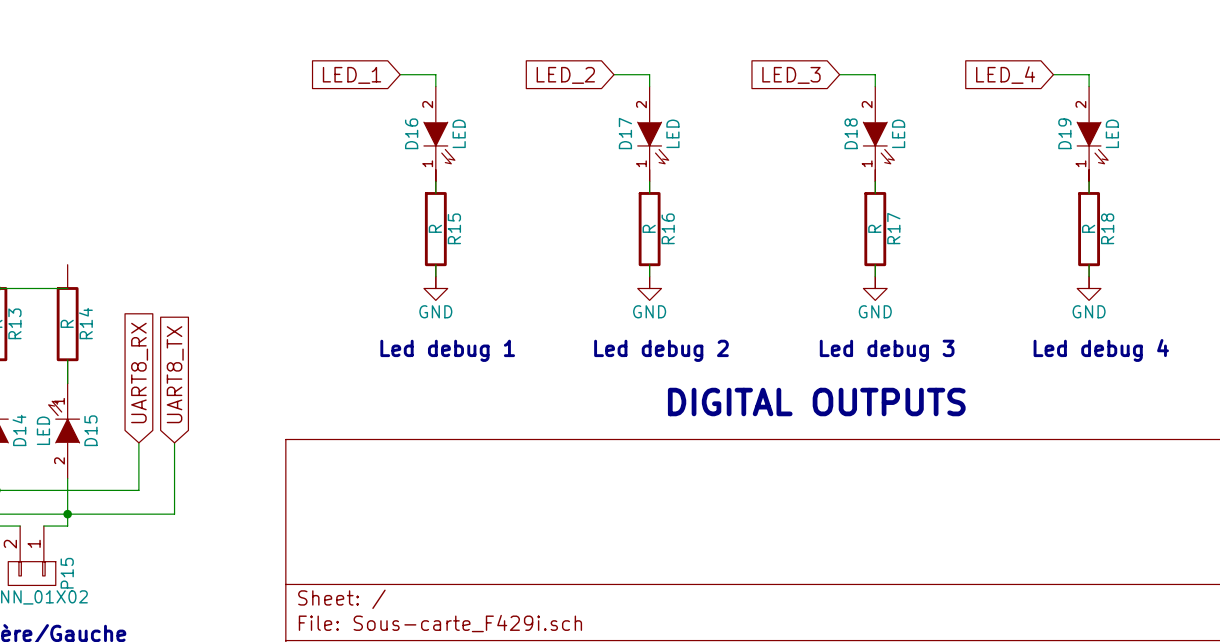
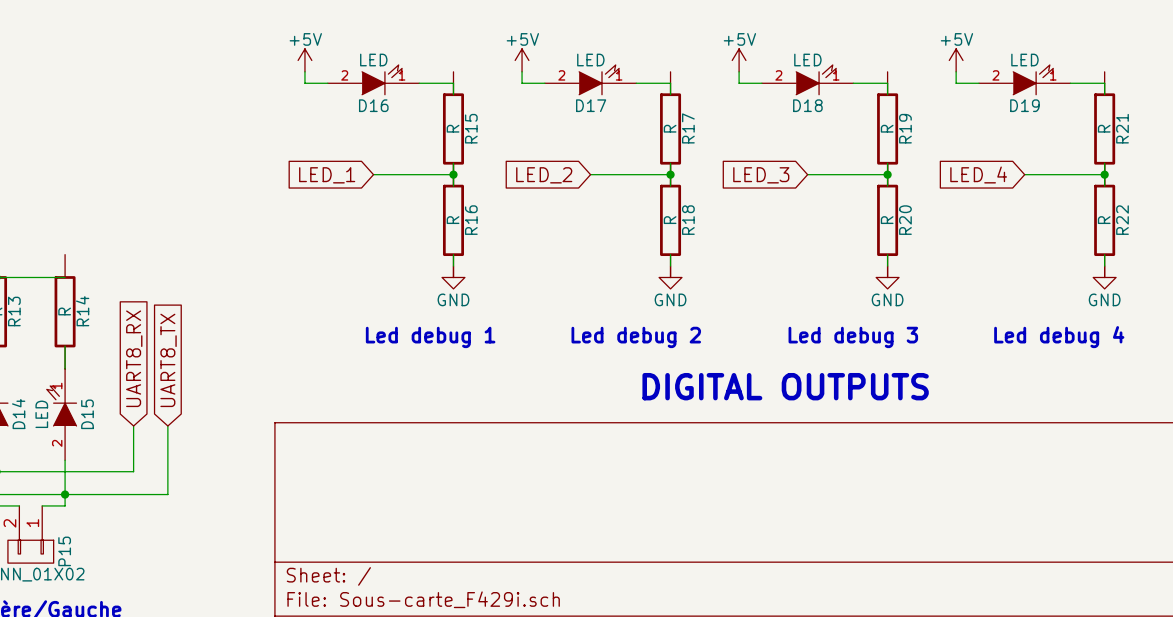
power symbol: none -> +5V (304, 60)
power symbol: none -> +5V (522, 60)
power symbol: none -> +5V (739, 60)
power symbol: none -> +5V (956, 60)
wire: none -> (304, 71) (304, 83) (327, 83)
wire: (400, 74) (435, 74) (435, 86) -> (453, 94) (453, 83) (419, 83)
wire: none -> (522, 71) (522, 83) (544, 83)
wire: (613, 74) (649, 74) (649, 86) -> (636, 83) (670, 83) (670, 94)
wire: none -> (739, 71) (739, 83) (761, 83)
wire: (839, 74) (875, 74) (875, 86) -> (853, 83) (887, 83) (887, 94)
wire: none -> (956, 71) (956, 83) (978, 83)
wire: (1053, 74) (1089, 74) (1089, 86) -> (1070, 83) (1104, 83) (1104, 94)
global label position: LED_1 (352, 75) -> LED_1 (327, 175)
global label position: LED_2 (565, 75) -> LED_2 (544, 175)
global label position: LED_3 (791, 75) -> LED_3 (761, 175)
global label position: LED_4 (1005, 75) -> LED_4 (978, 174)
D16 position: (439, 134) -> (373, 79)
D17 position: (653, 134) -> (590, 79)
D18 position: (878, 134) -> (807, 79)
R19: none -> R (887, 128)
D19 position: (1092, 134) -> (1024, 79)
R21: none -> R (1104, 128)
D16 rotation: 0° (439, 142) -> 90° counterclockwise (382, 79)
D17 rotation: 0° (653, 142) -> 90° counterclockwise (599, 79)
D18 rotation: 0° (878, 142) -> 90° counterclockwise (816, 79)
D19 rotation: 0° (1092, 142) -> 90° counterclockwise (1033, 79)
wire: none -> (453, 163) (453, 186)
wire: none -> (670, 163) (670, 186)
wire: none -> (887, 163) (887, 186)
wire: none -> (1104, 163) (1104, 186)
wire: none -> (373, 174) (453, 174)
wire: (435, 181) (435, 193) -> none
junction: none -> (453, 174)
wire: none -> (590, 174) (670, 174)
wire: (649, 181) (649, 193) -> (453, 254) (453, 266)
junction: none -> (670, 174)
wire: none -> (807, 174) (887, 174)
wire: (875, 181) (875, 193) -> none
junction: none -> (887, 174)
wire: none -> (1024, 174) (1104, 174)
wire: (1089, 181) (1089, 193) -> none
junction: none -> (1104, 174)
R15 position: (435, 229) -> (453, 128)
R16 position: (649, 229) -> (453, 220)
R17 position: (875, 229) -> (670, 128)
R20: none -> R (887, 220)
R18 position: (1089, 229) -> (670, 220)
R22: none -> R (1104, 220)
wire: (435, 264) (435, 276) -> none
wire: (649, 264) (649, 276) -> (670, 254) (670, 266)
wire: (875, 264) (875, 276) -> (887, 254) (887, 266)
wire: (1089, 264) (1089, 276) -> (1104, 254) (1104, 266)
power symbol position: GND (435, 288) -> GND (453, 277)
power symbol position: GND (649, 288) -> GND (670, 277)
power symbol position: GND (875, 288) -> GND (887, 277)
power symbol position: GND (1089, 288) -> GND (1104, 277)

